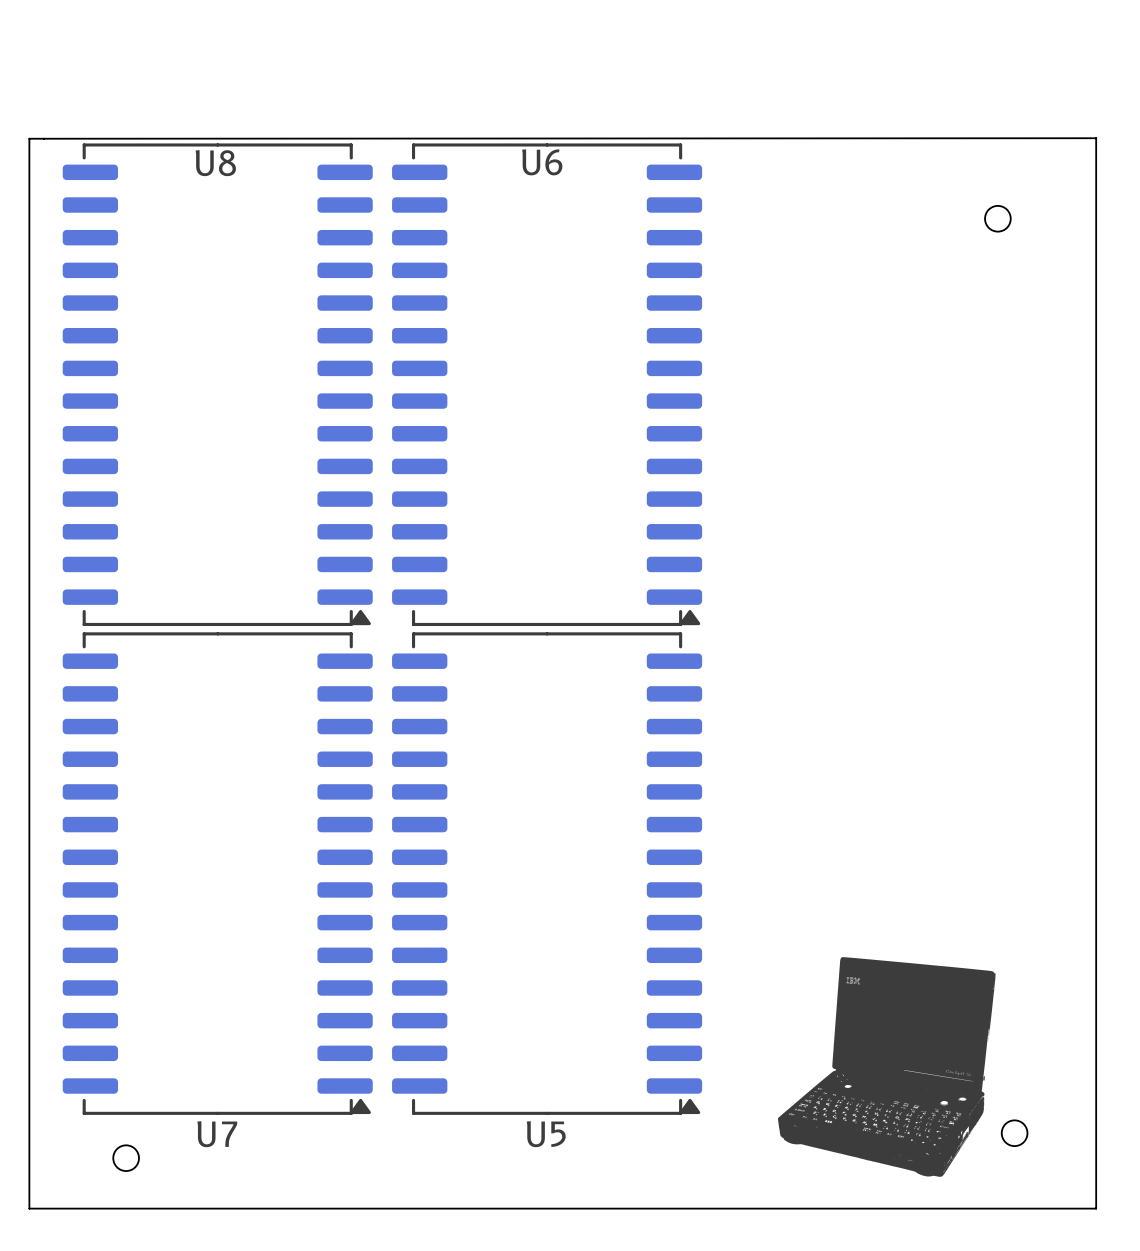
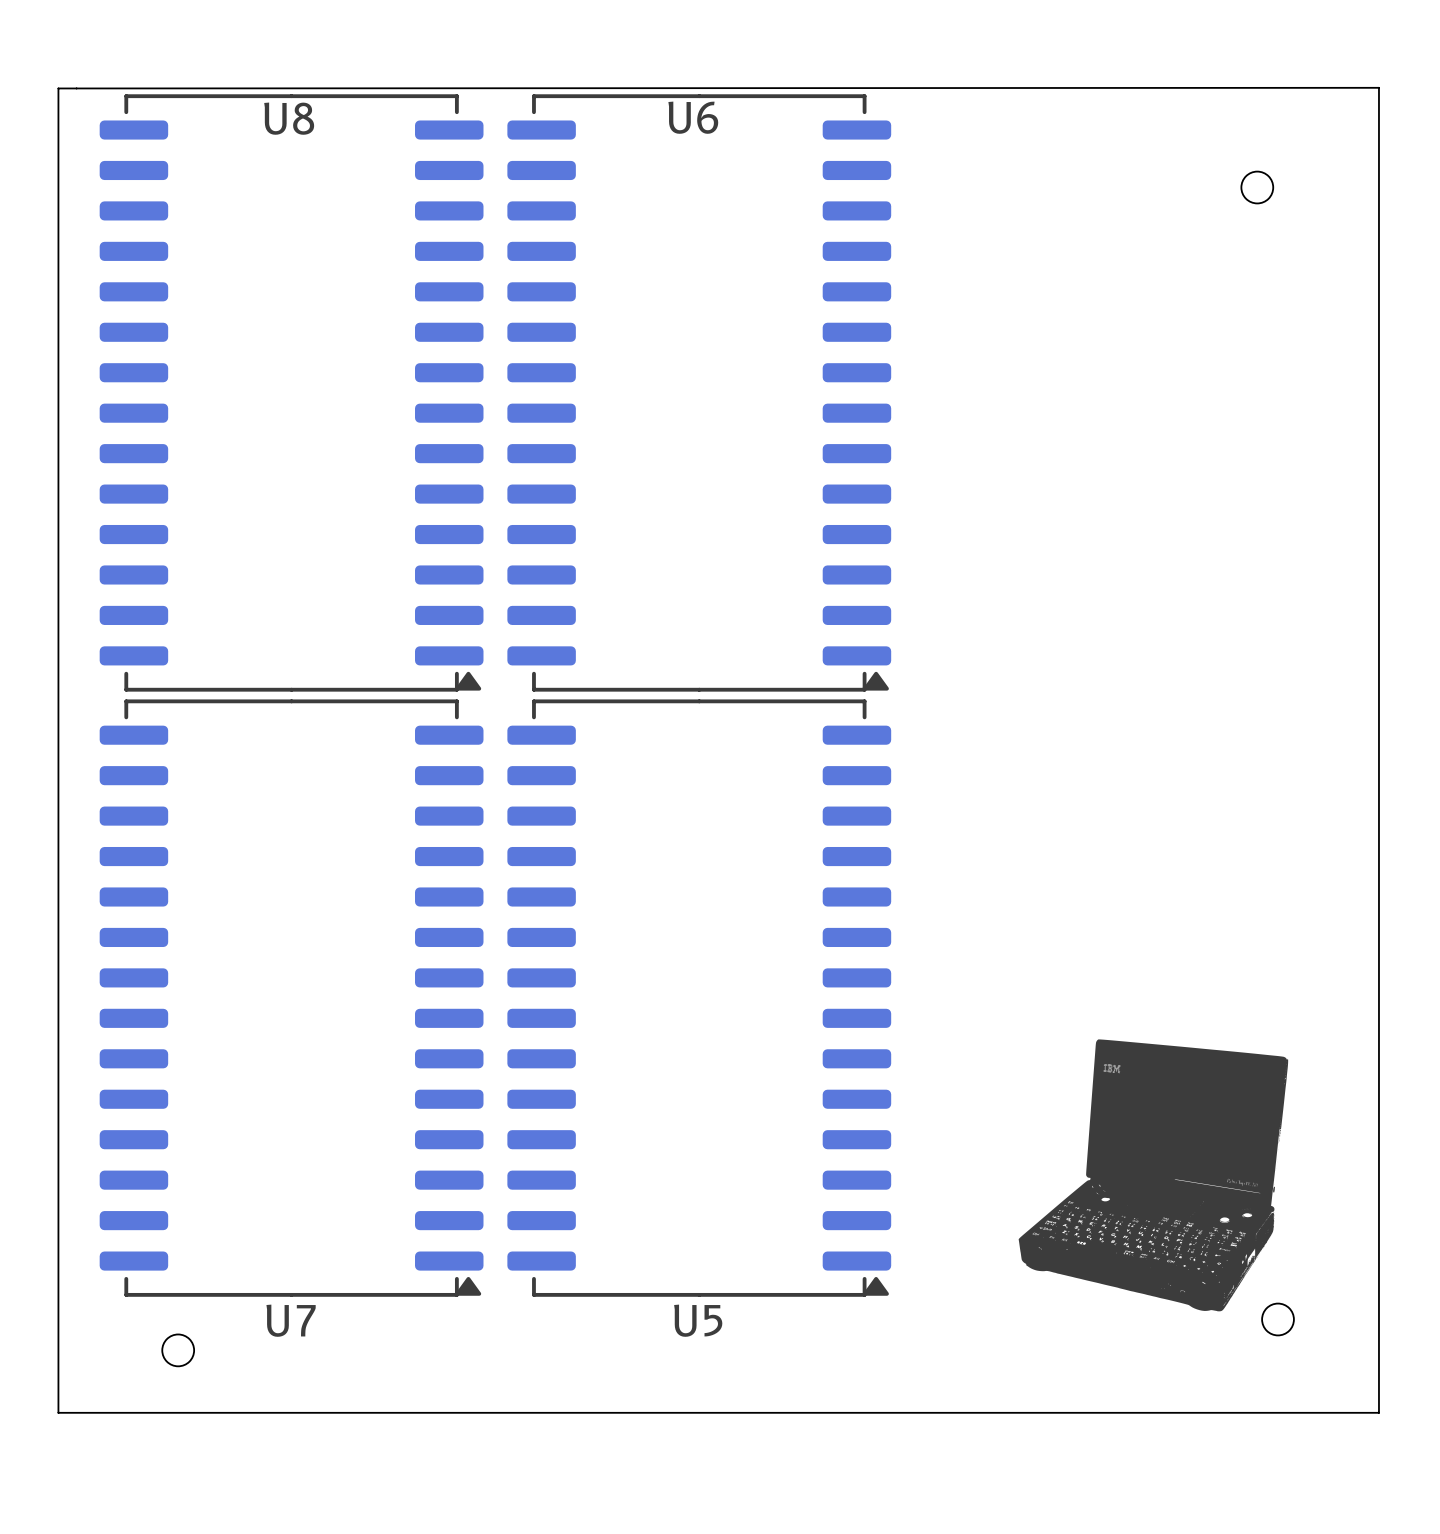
part position: (886, 1066) -> (1153, 1175)

